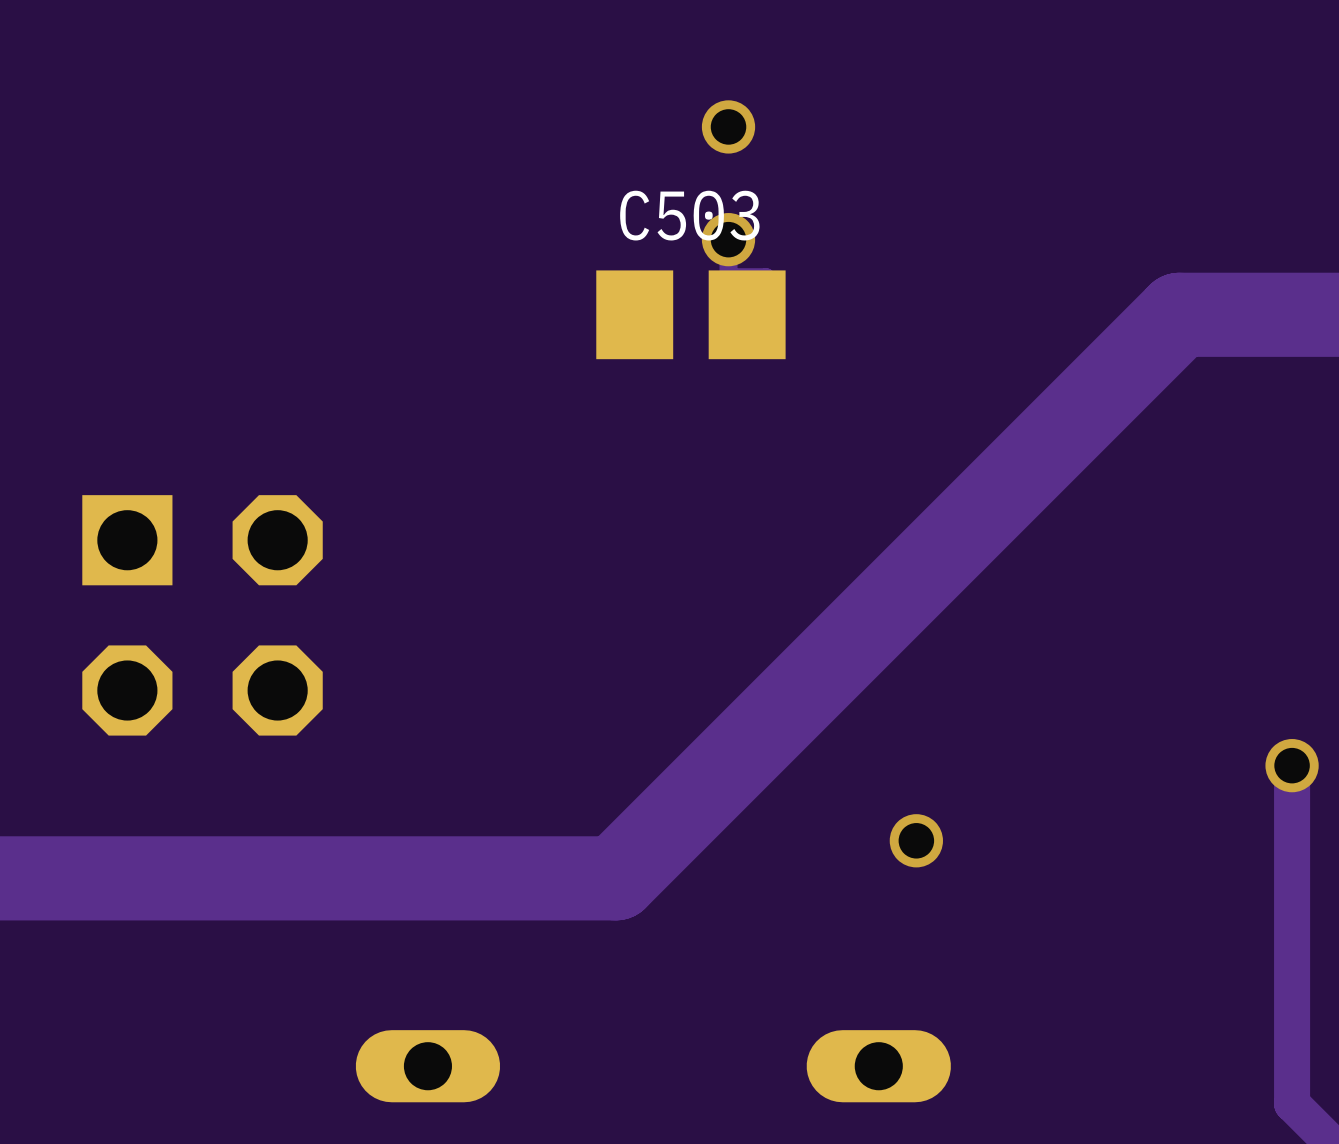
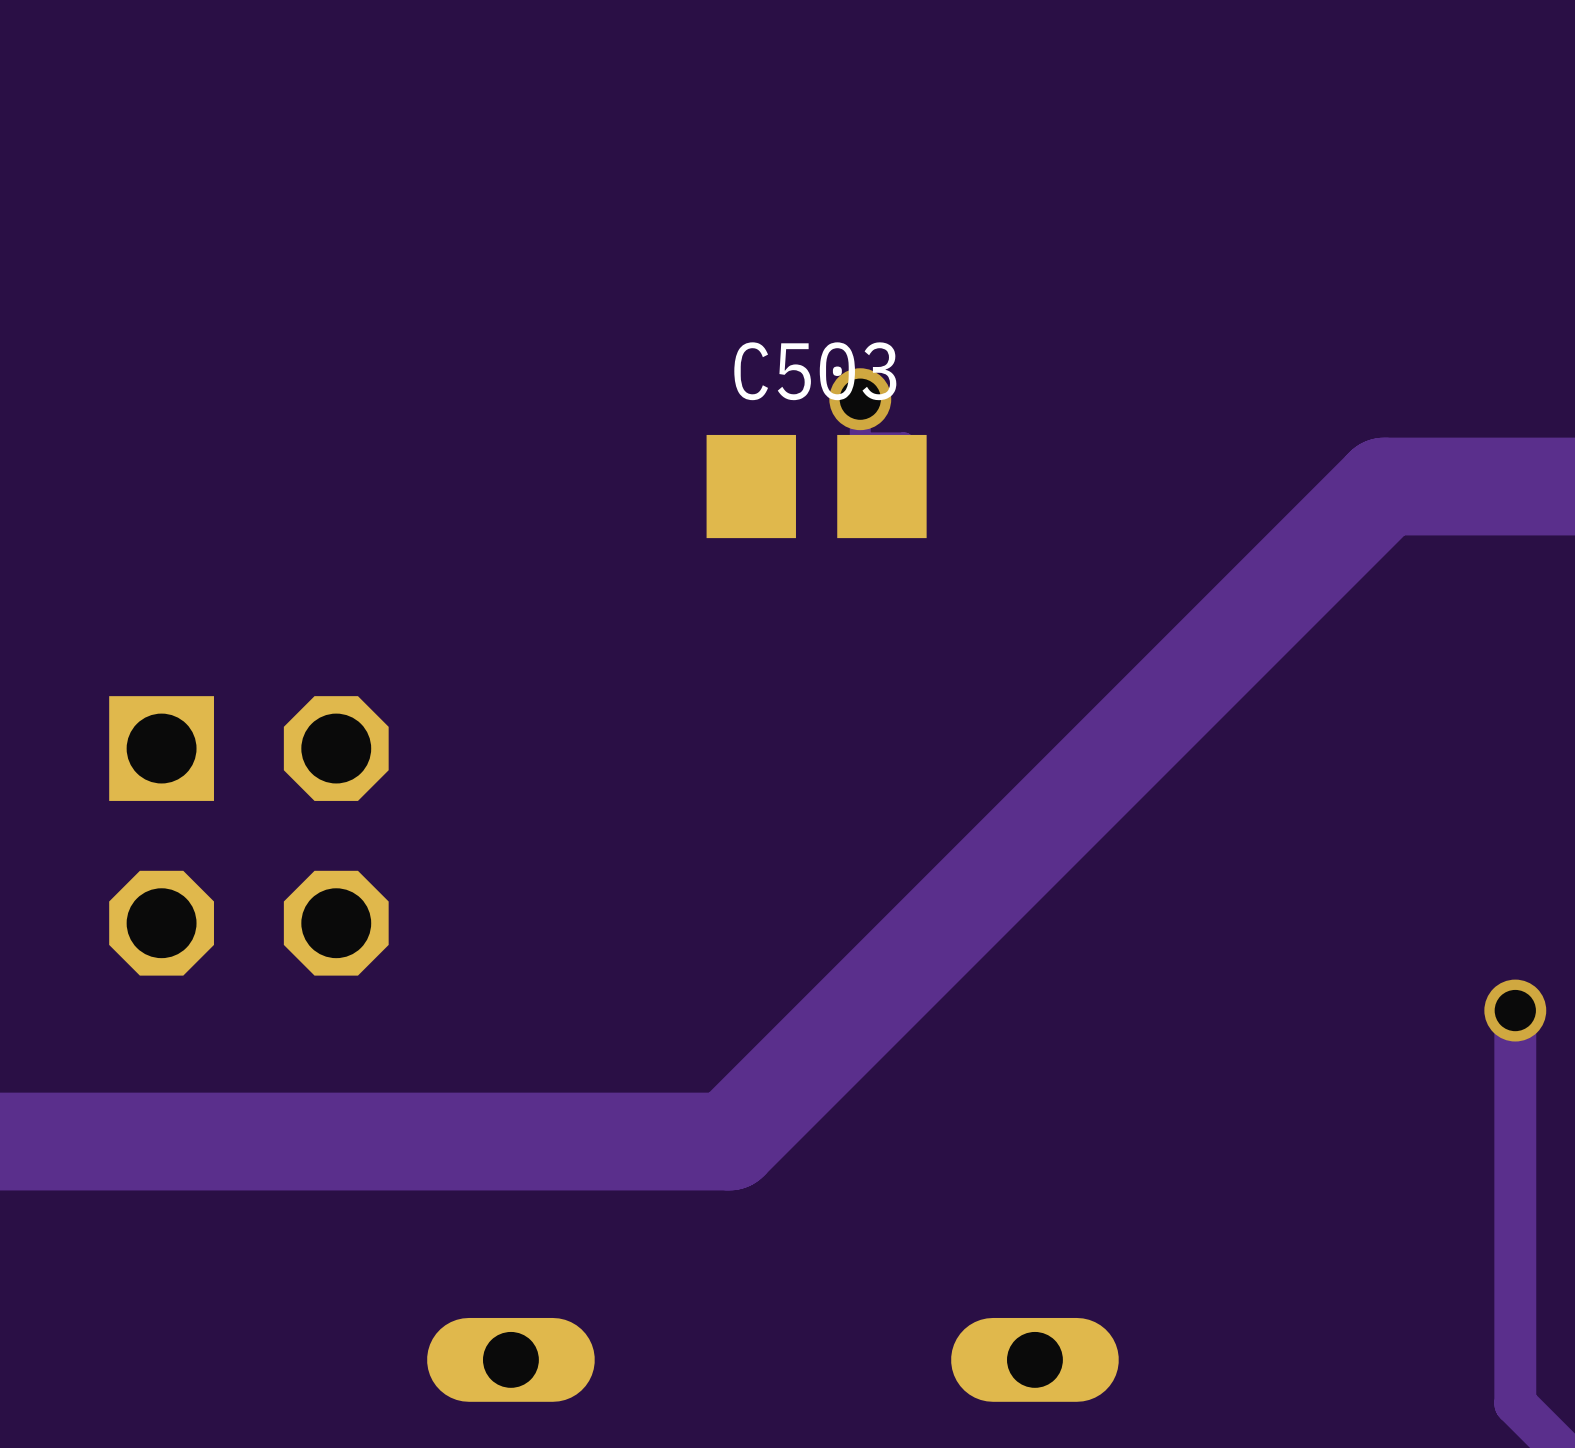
via: (728, 126) -> none
via: (916, 840) -> none

